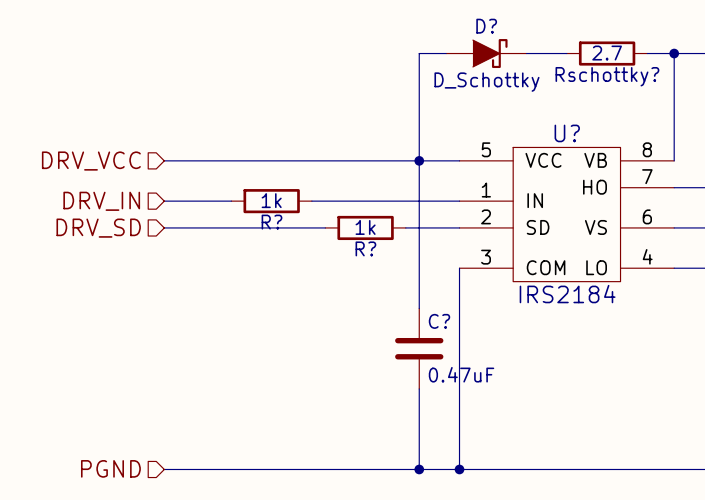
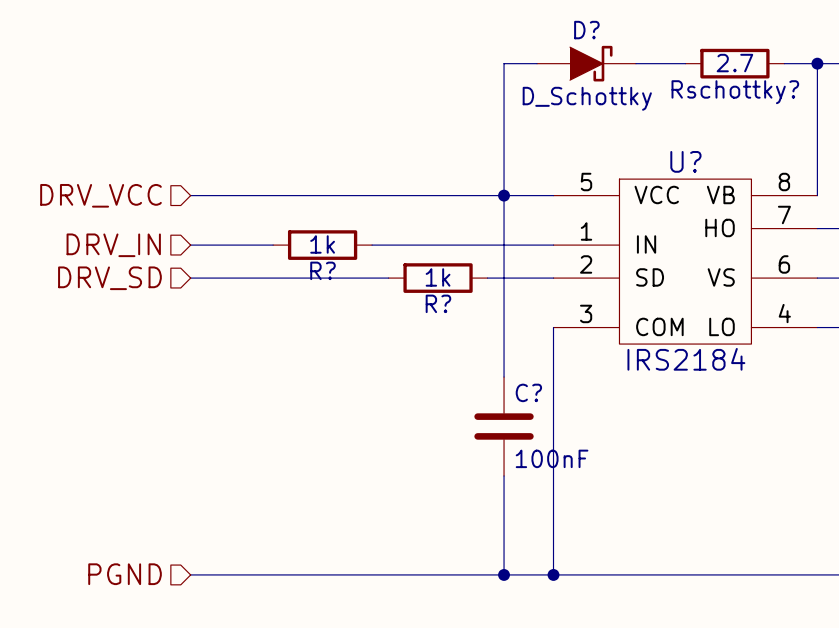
C? value: 0.47uF (461, 374) -> 100nF (552, 458)

